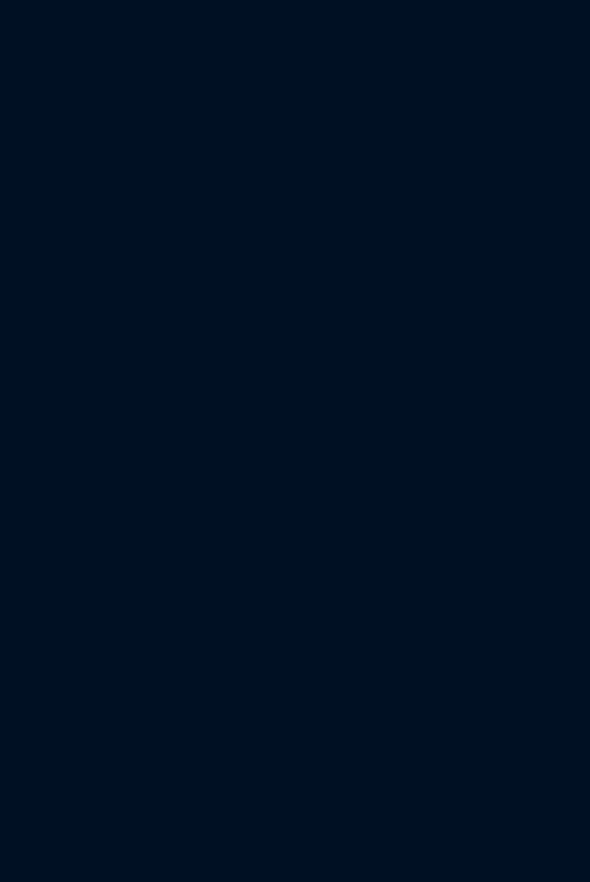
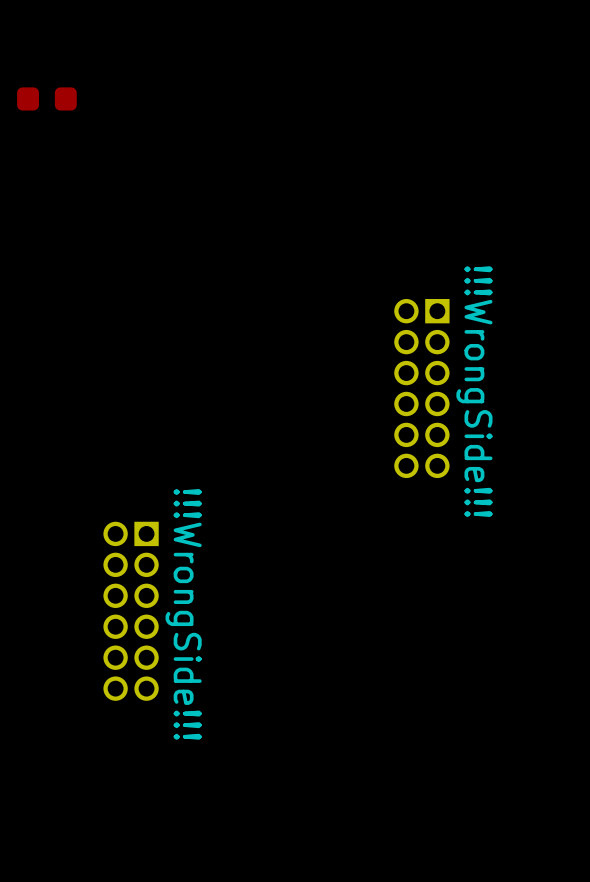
part: none -> (46, 98)
part: none -> (421, 388)
part: none -> (131, 611)

